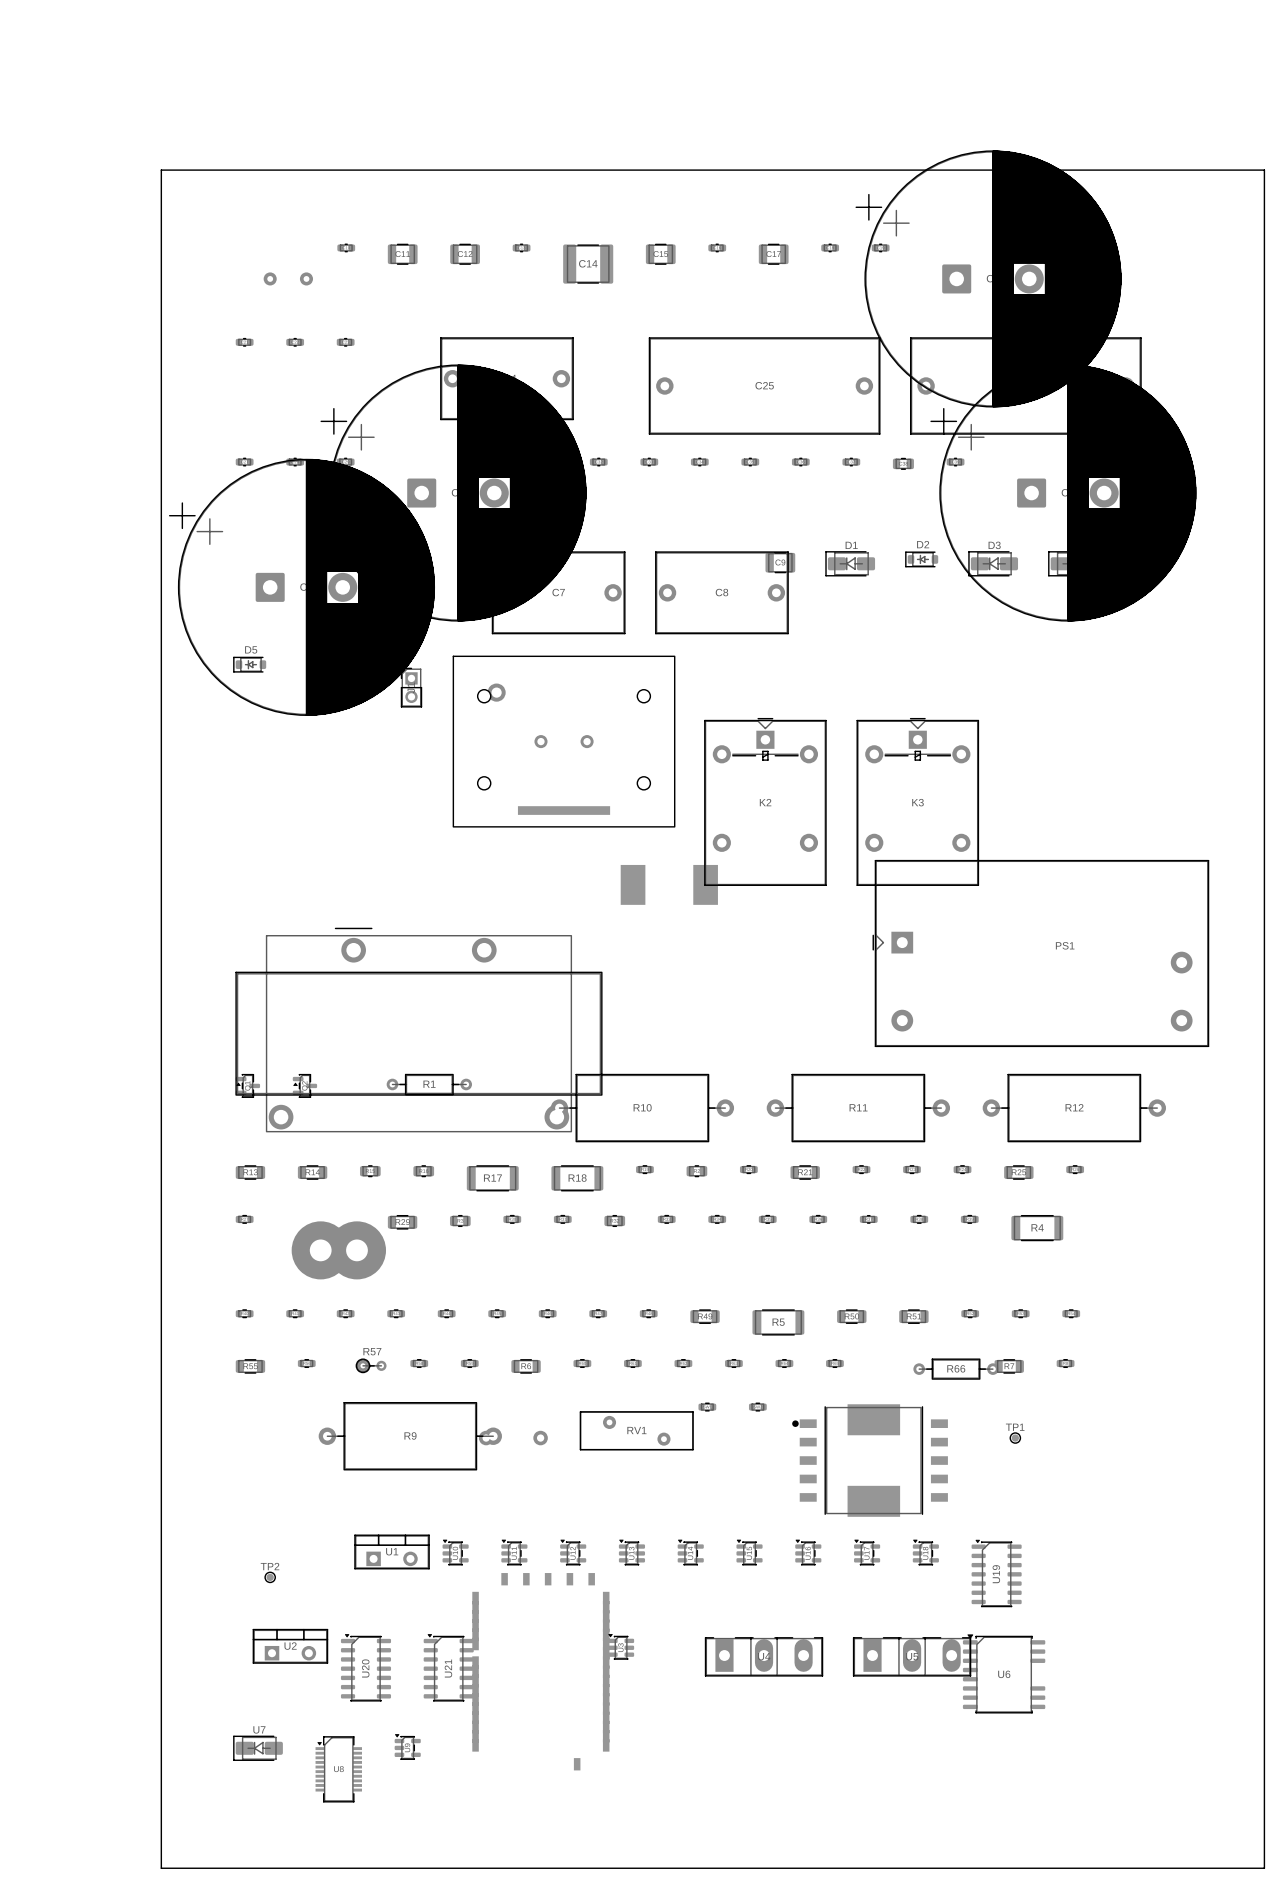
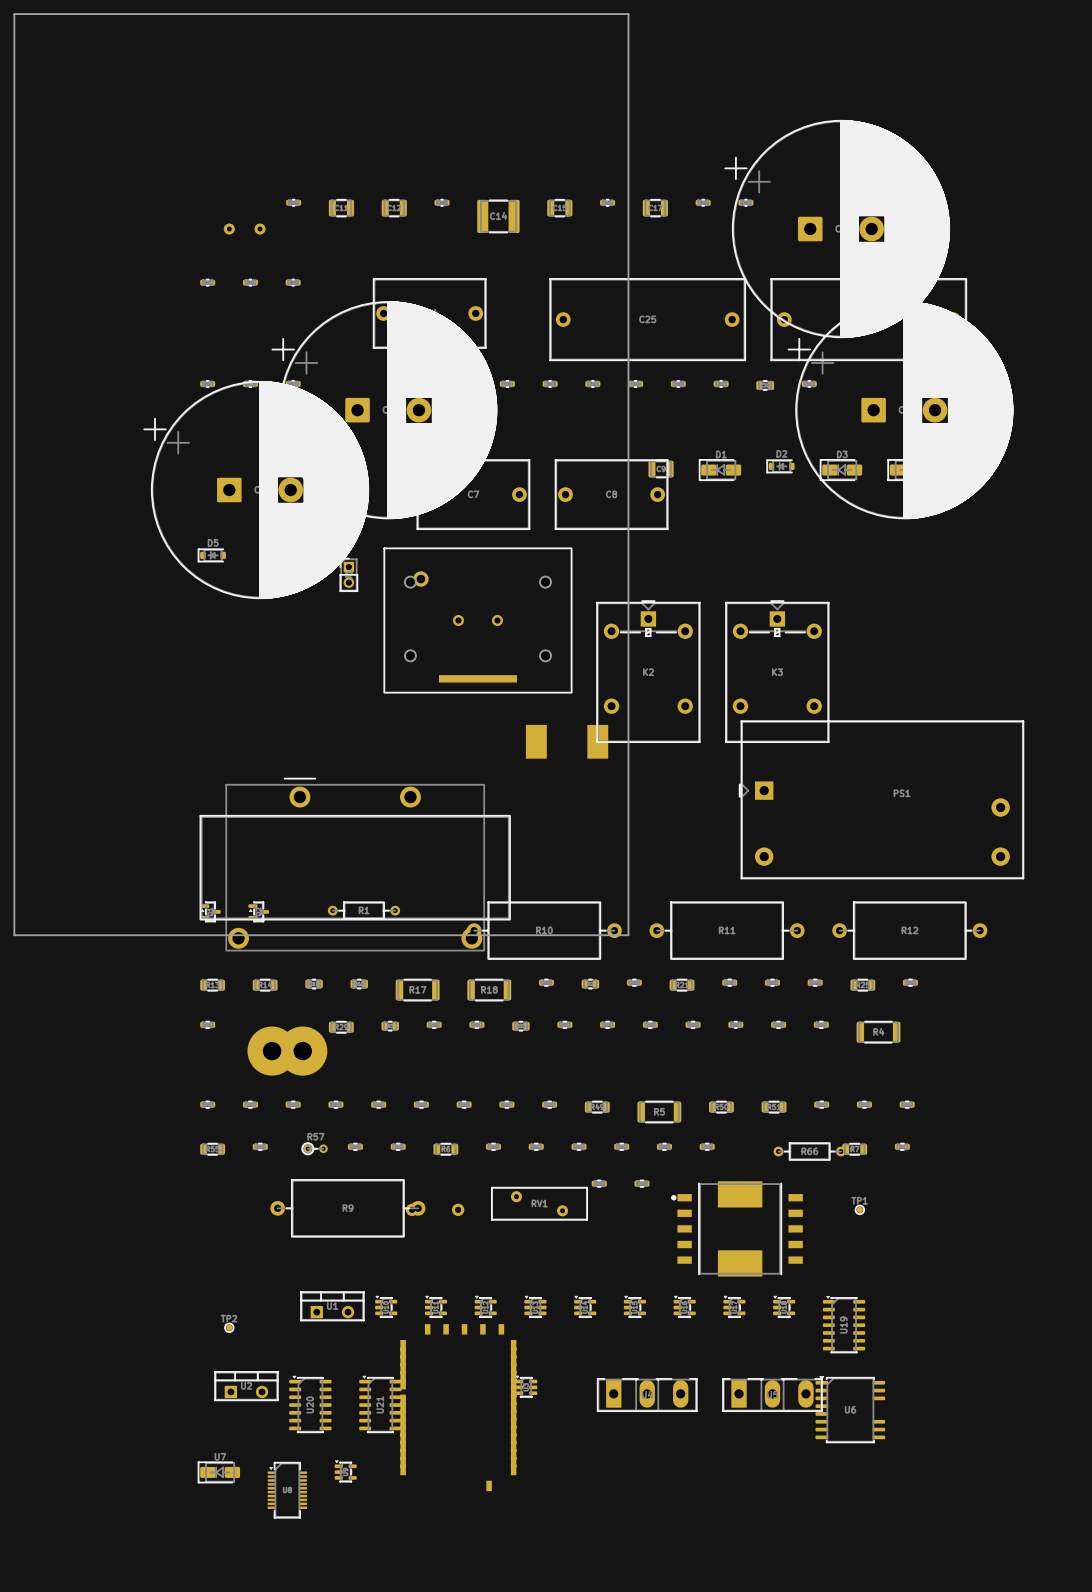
board edge: none -> (14, 14) (628, 14) (628, 935) (14, 935) (14, 14)
board edge: (161, 170) (1264, 170) (1264, 1868) (161, 1868) (161, 170) -> none

